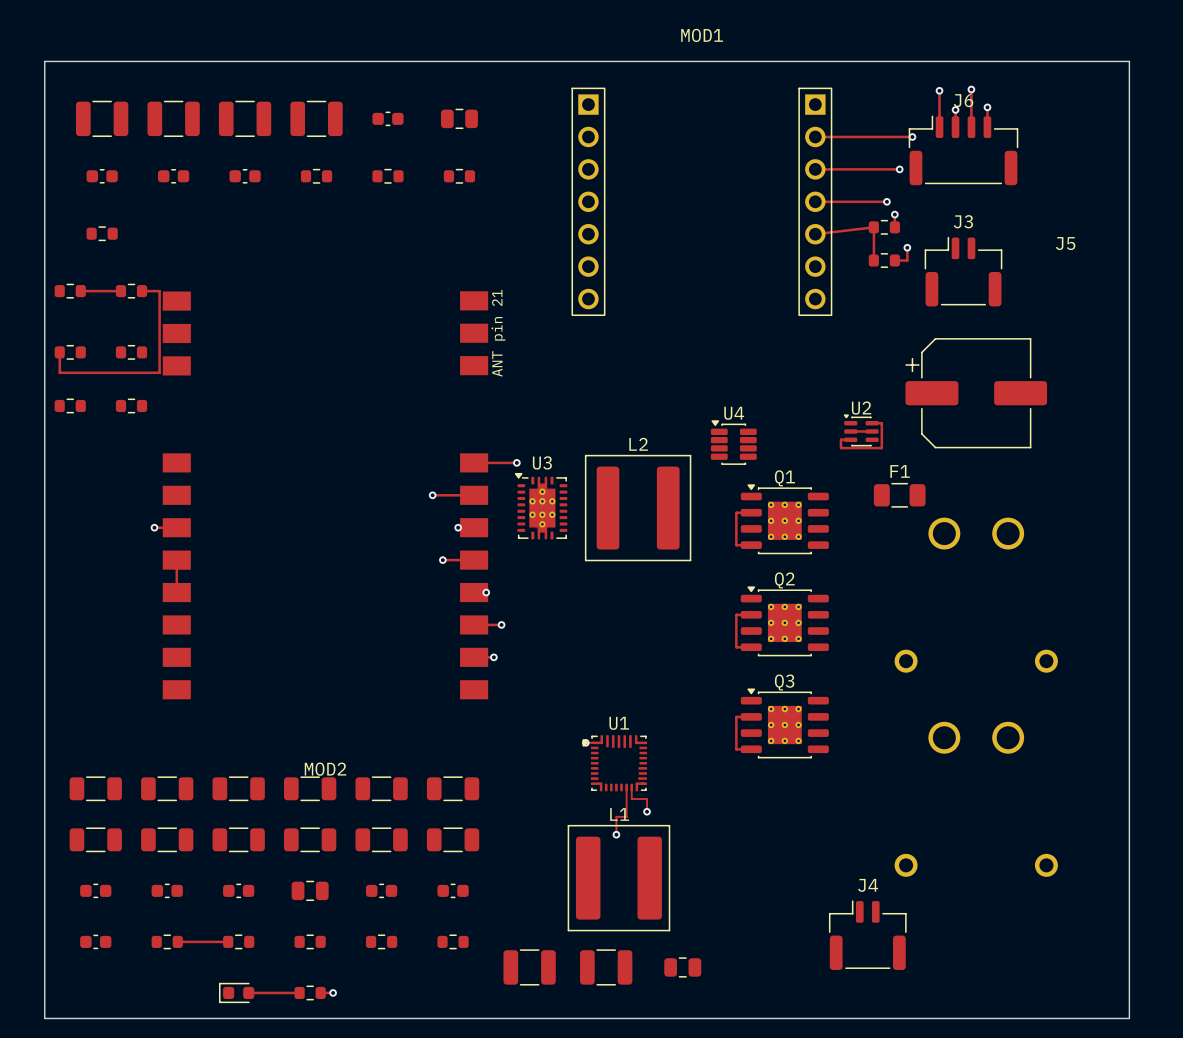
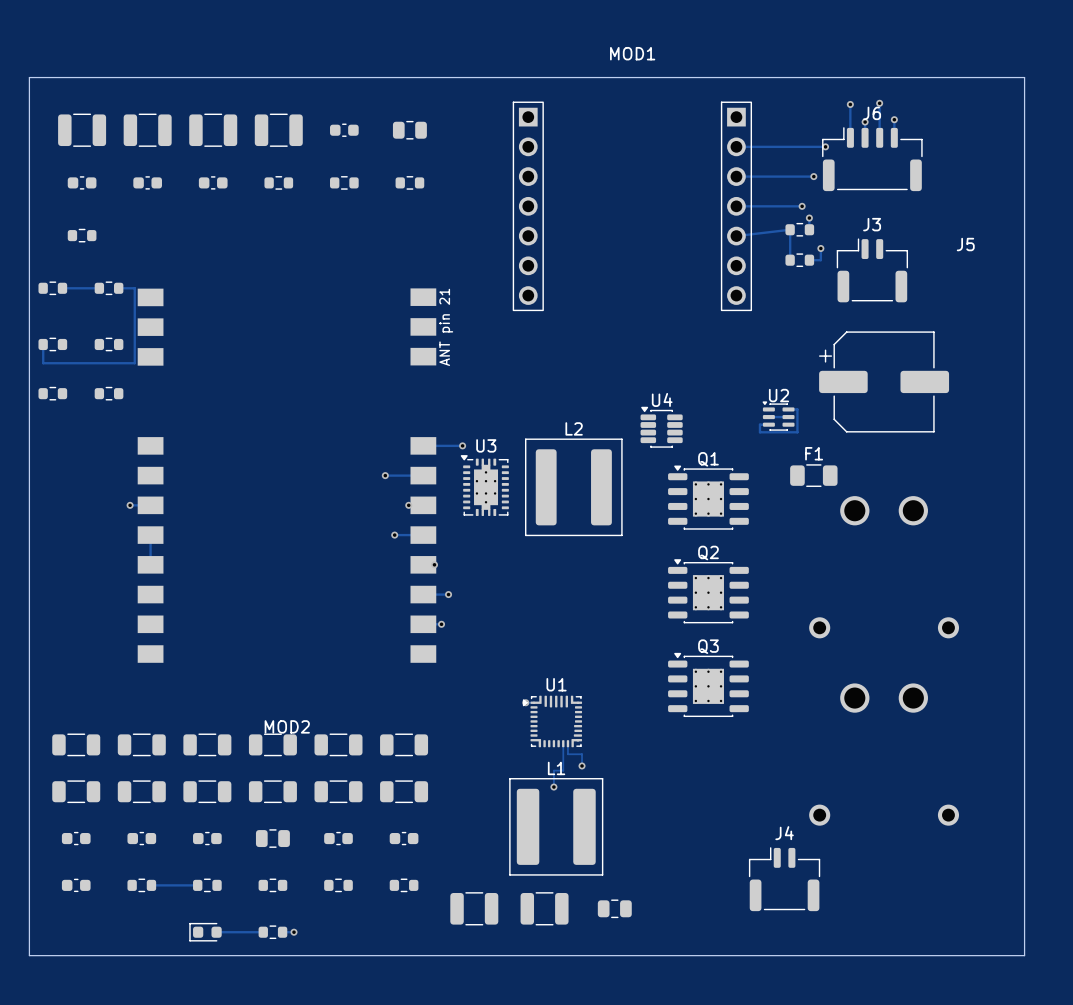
track: (751, 512) (736, 512) (736, 545) (751, 545) -> none
track: (751, 614) (736, 614) (736, 647) (751, 647) -> none
track: (751, 716) (736, 716) (736, 749) (751, 749) -> none

